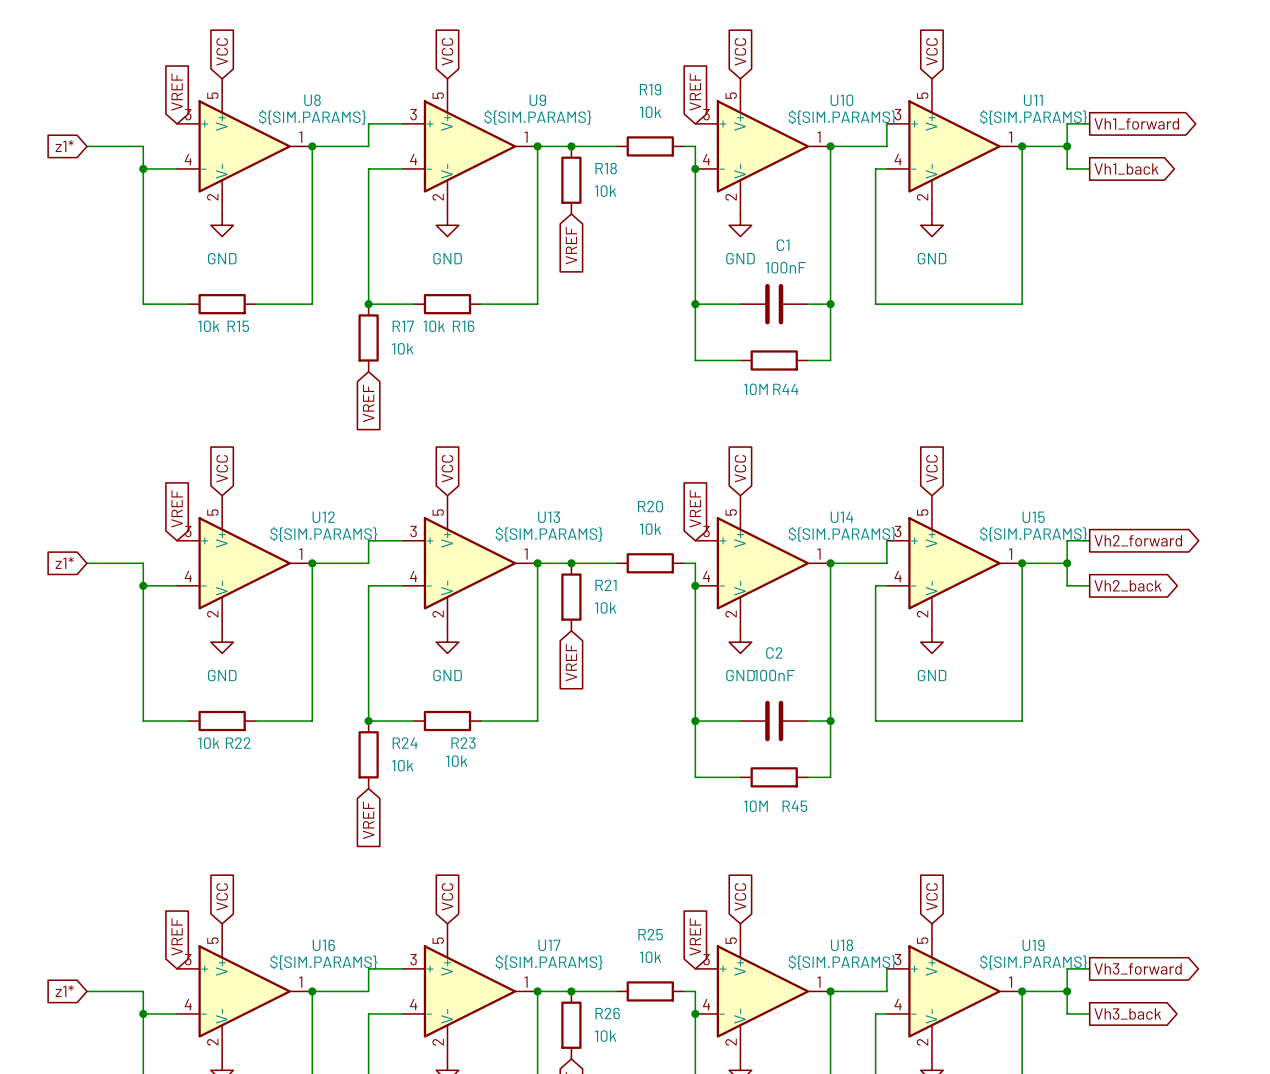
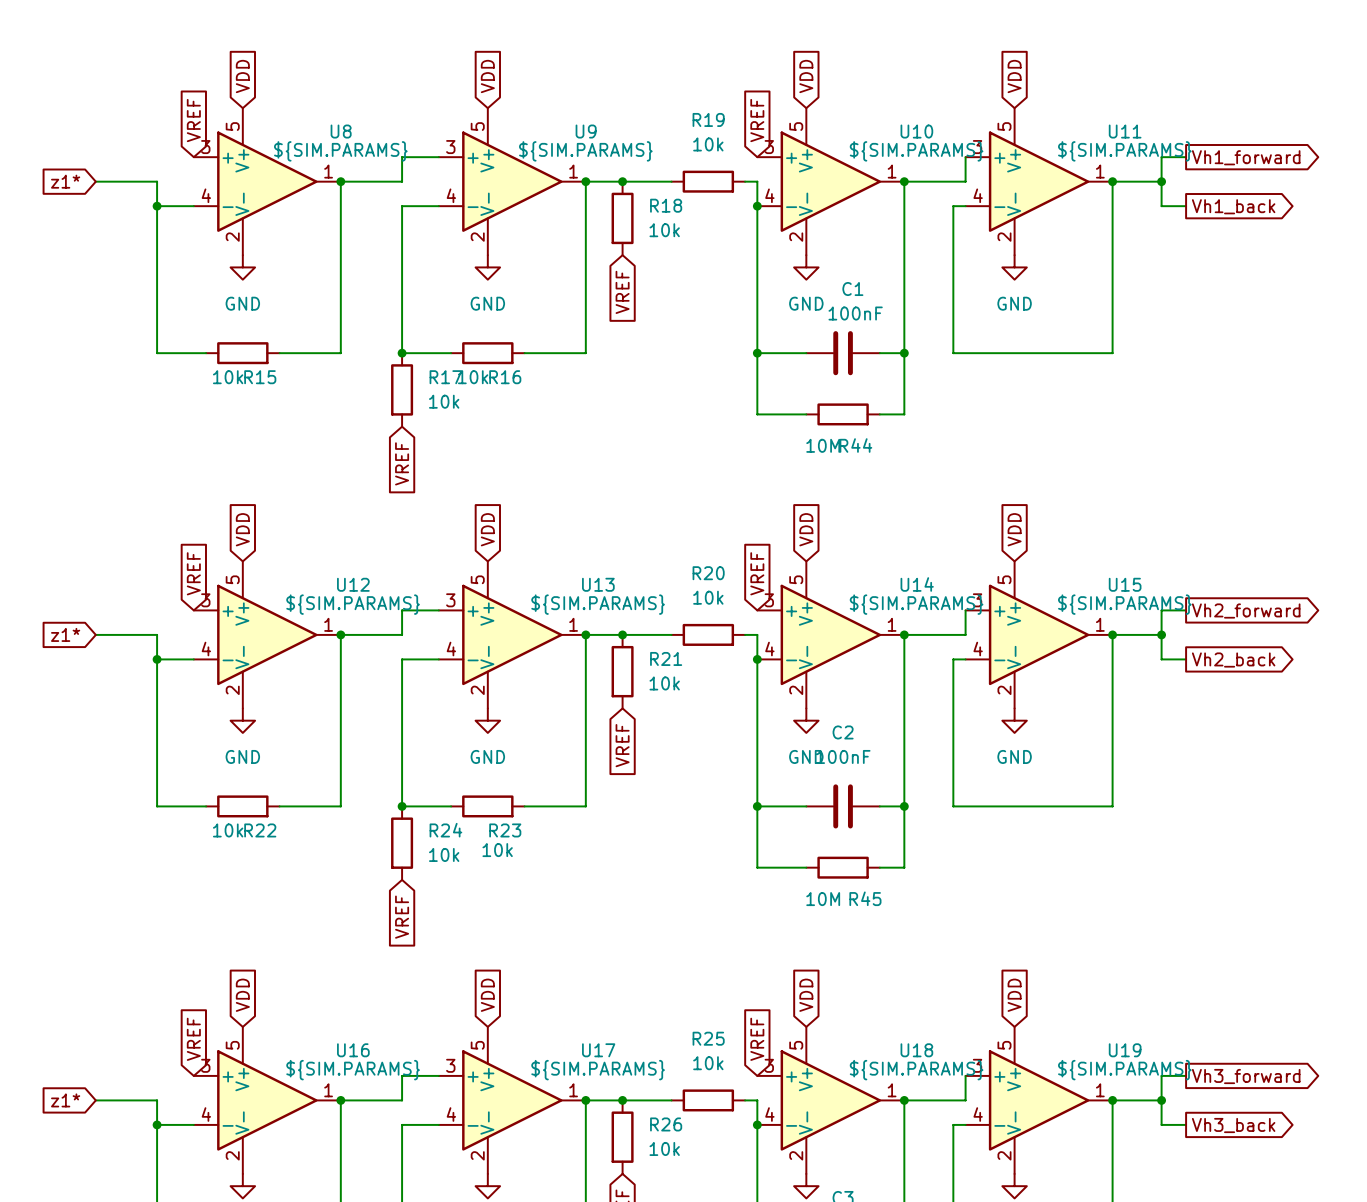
global label: VCC (222, 51) -> VDD (242, 76)
global label: VCC (447, 51) -> VDD (487, 76)
global label: VCC (740, 51) -> VDD (806, 76)
global label: VCC (931, 51) -> VDD (1014, 76)
global label: VCC (222, 468) -> VDD (242, 529)
global label: VCC (447, 468) -> VDD (487, 529)
global label: VCC (740, 468) -> VDD (806, 529)
global label: VCC (931, 468) -> VDD (1014, 529)
global label: VCC (222, 896) -> VDD (242, 995)
global label: VCC (447, 896) -> VDD (487, 995)
global label: VCC (740, 896) -> VDD (806, 995)
global label: VCC (931, 896) -> VDD (1014, 995)

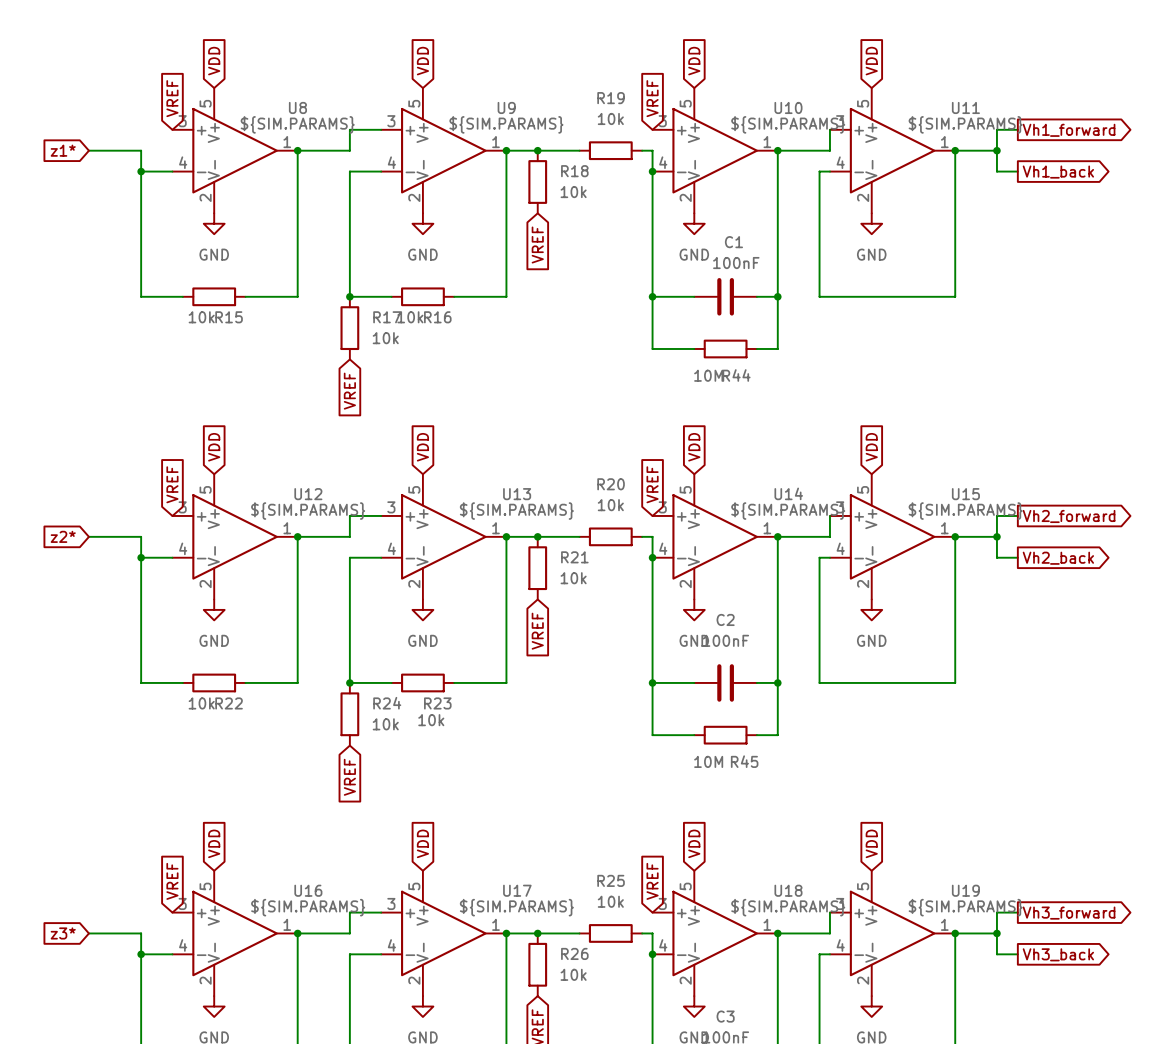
global label: z1* (65, 634) -> z2* (63, 536)
global label: z1* (65, 1100) -> z3* (63, 933)

